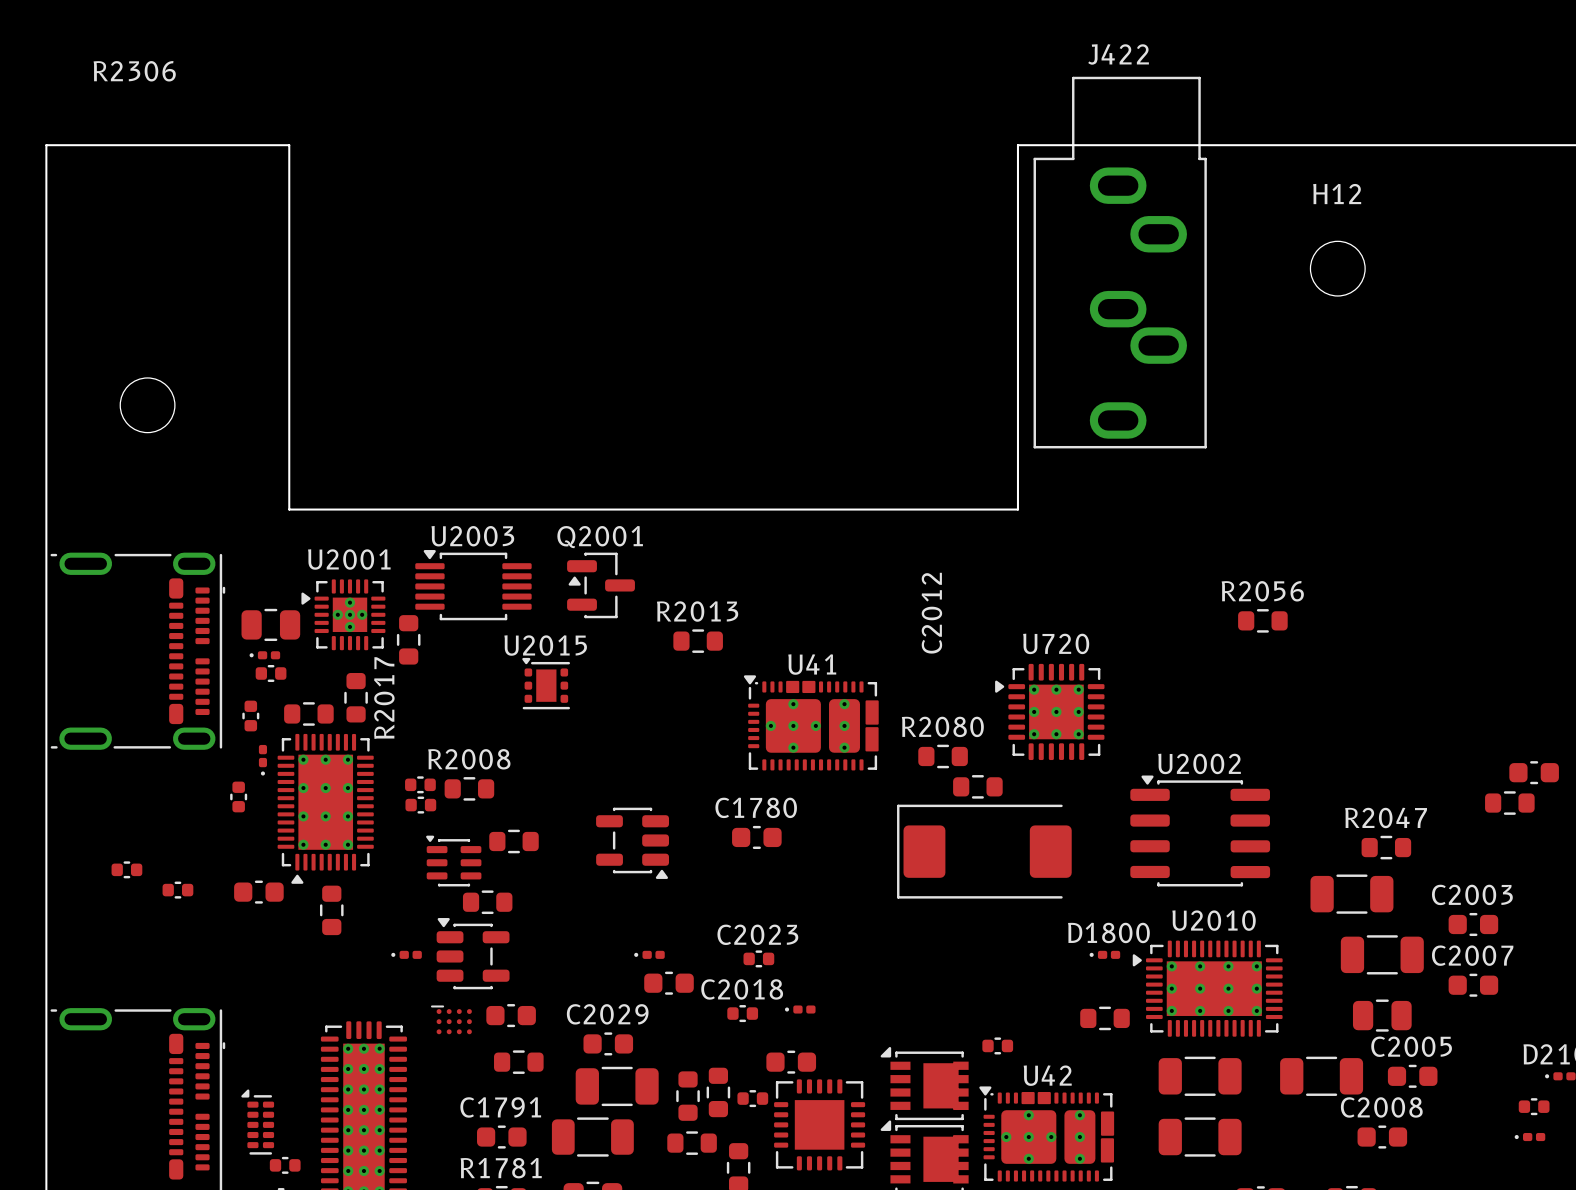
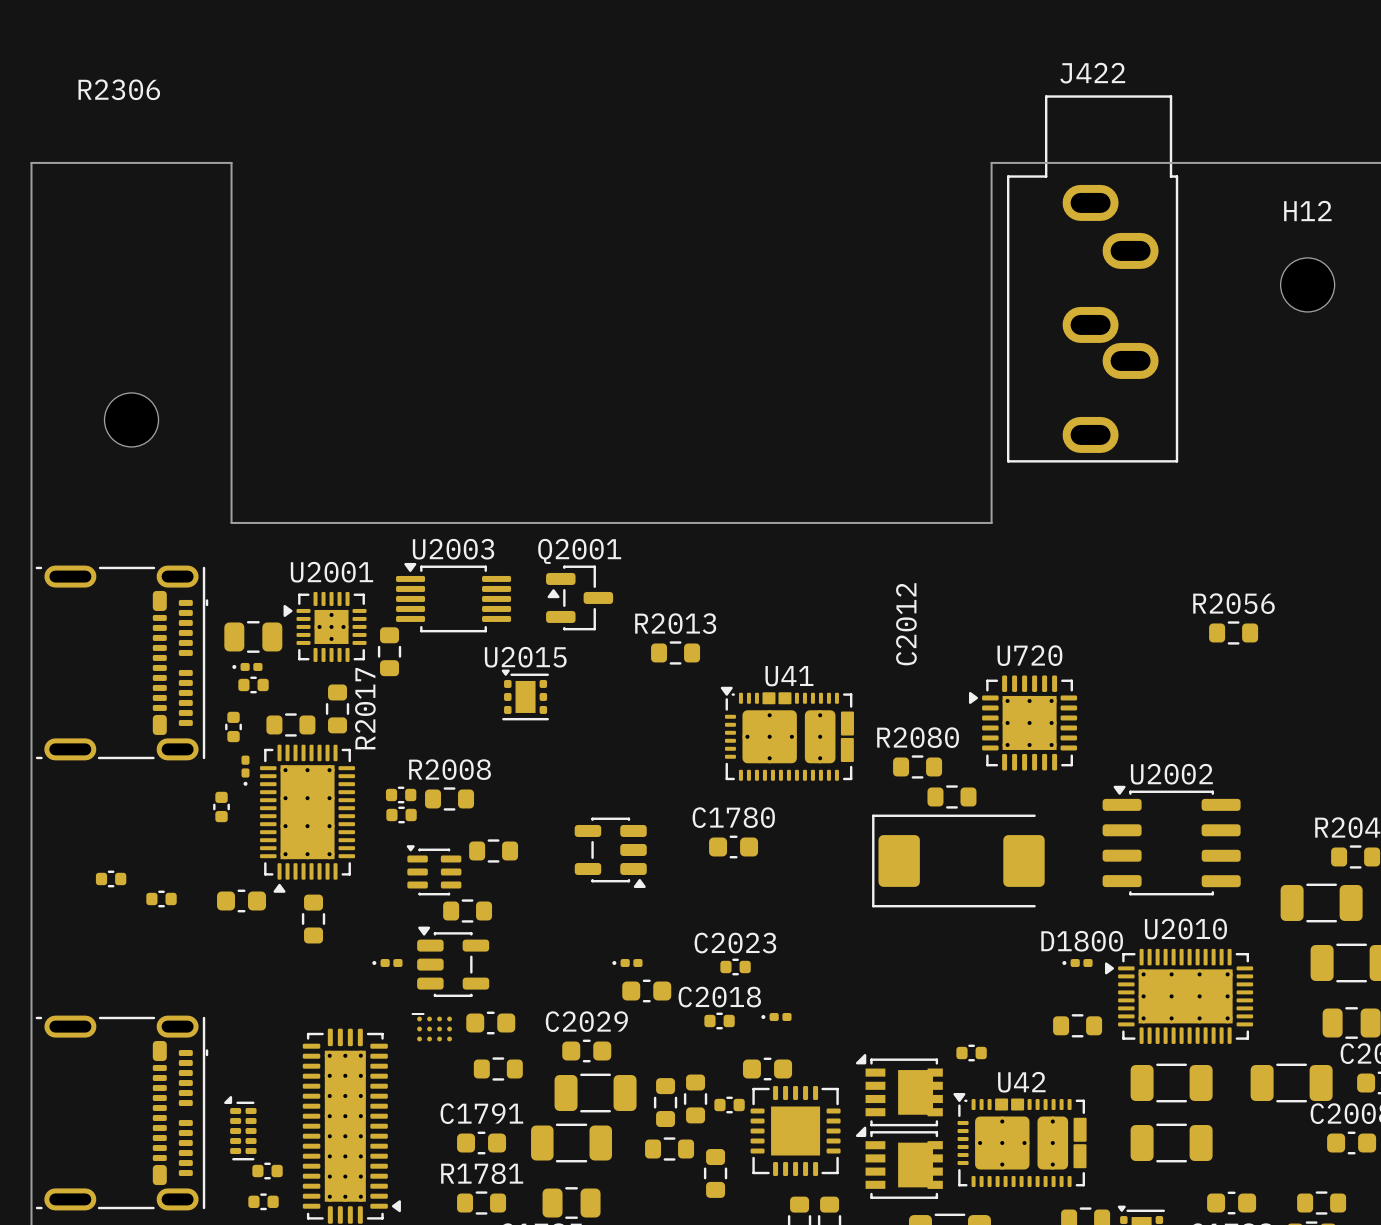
board edge: (248, 145) (289, 145) (289, 509) -> (231, 162) (231, 522) (271, 522)

